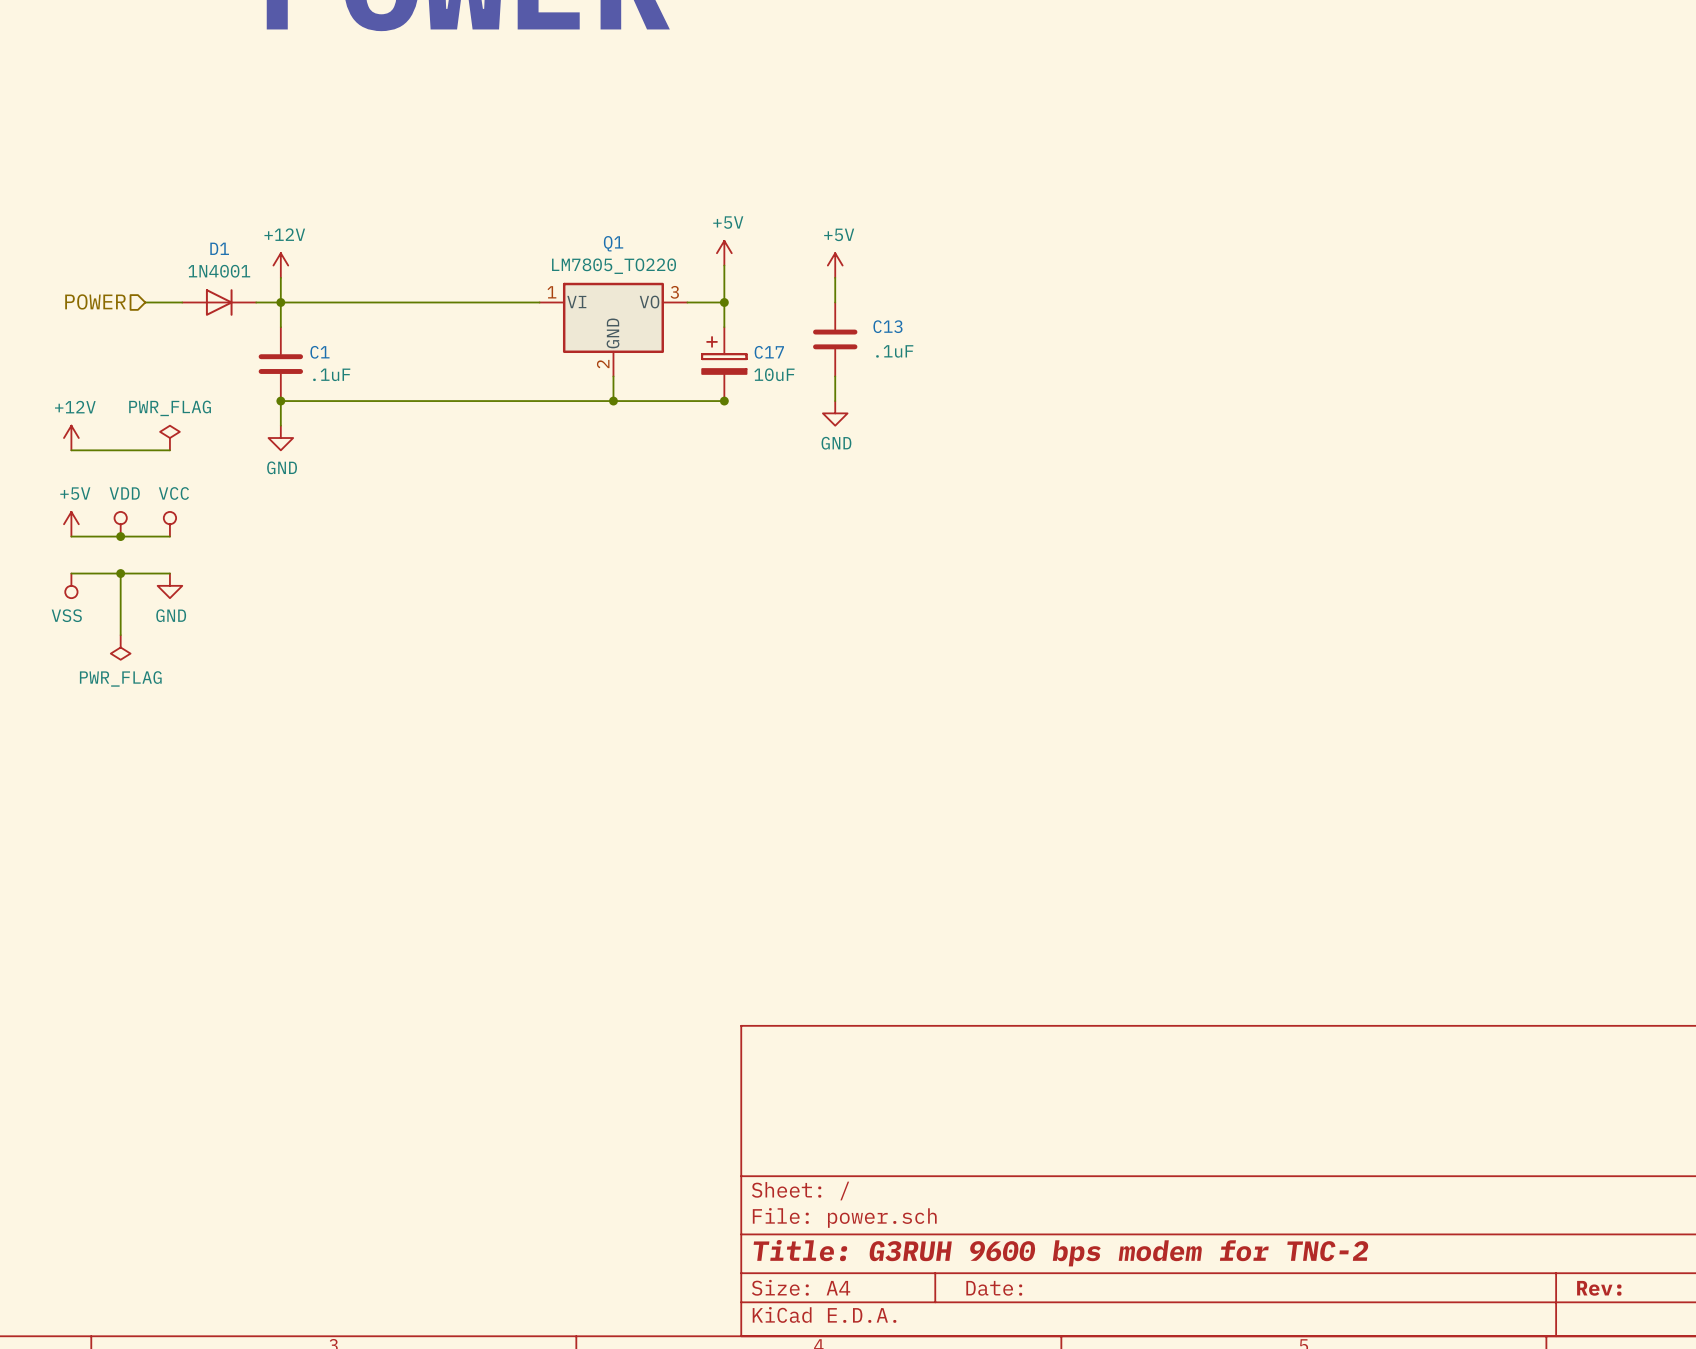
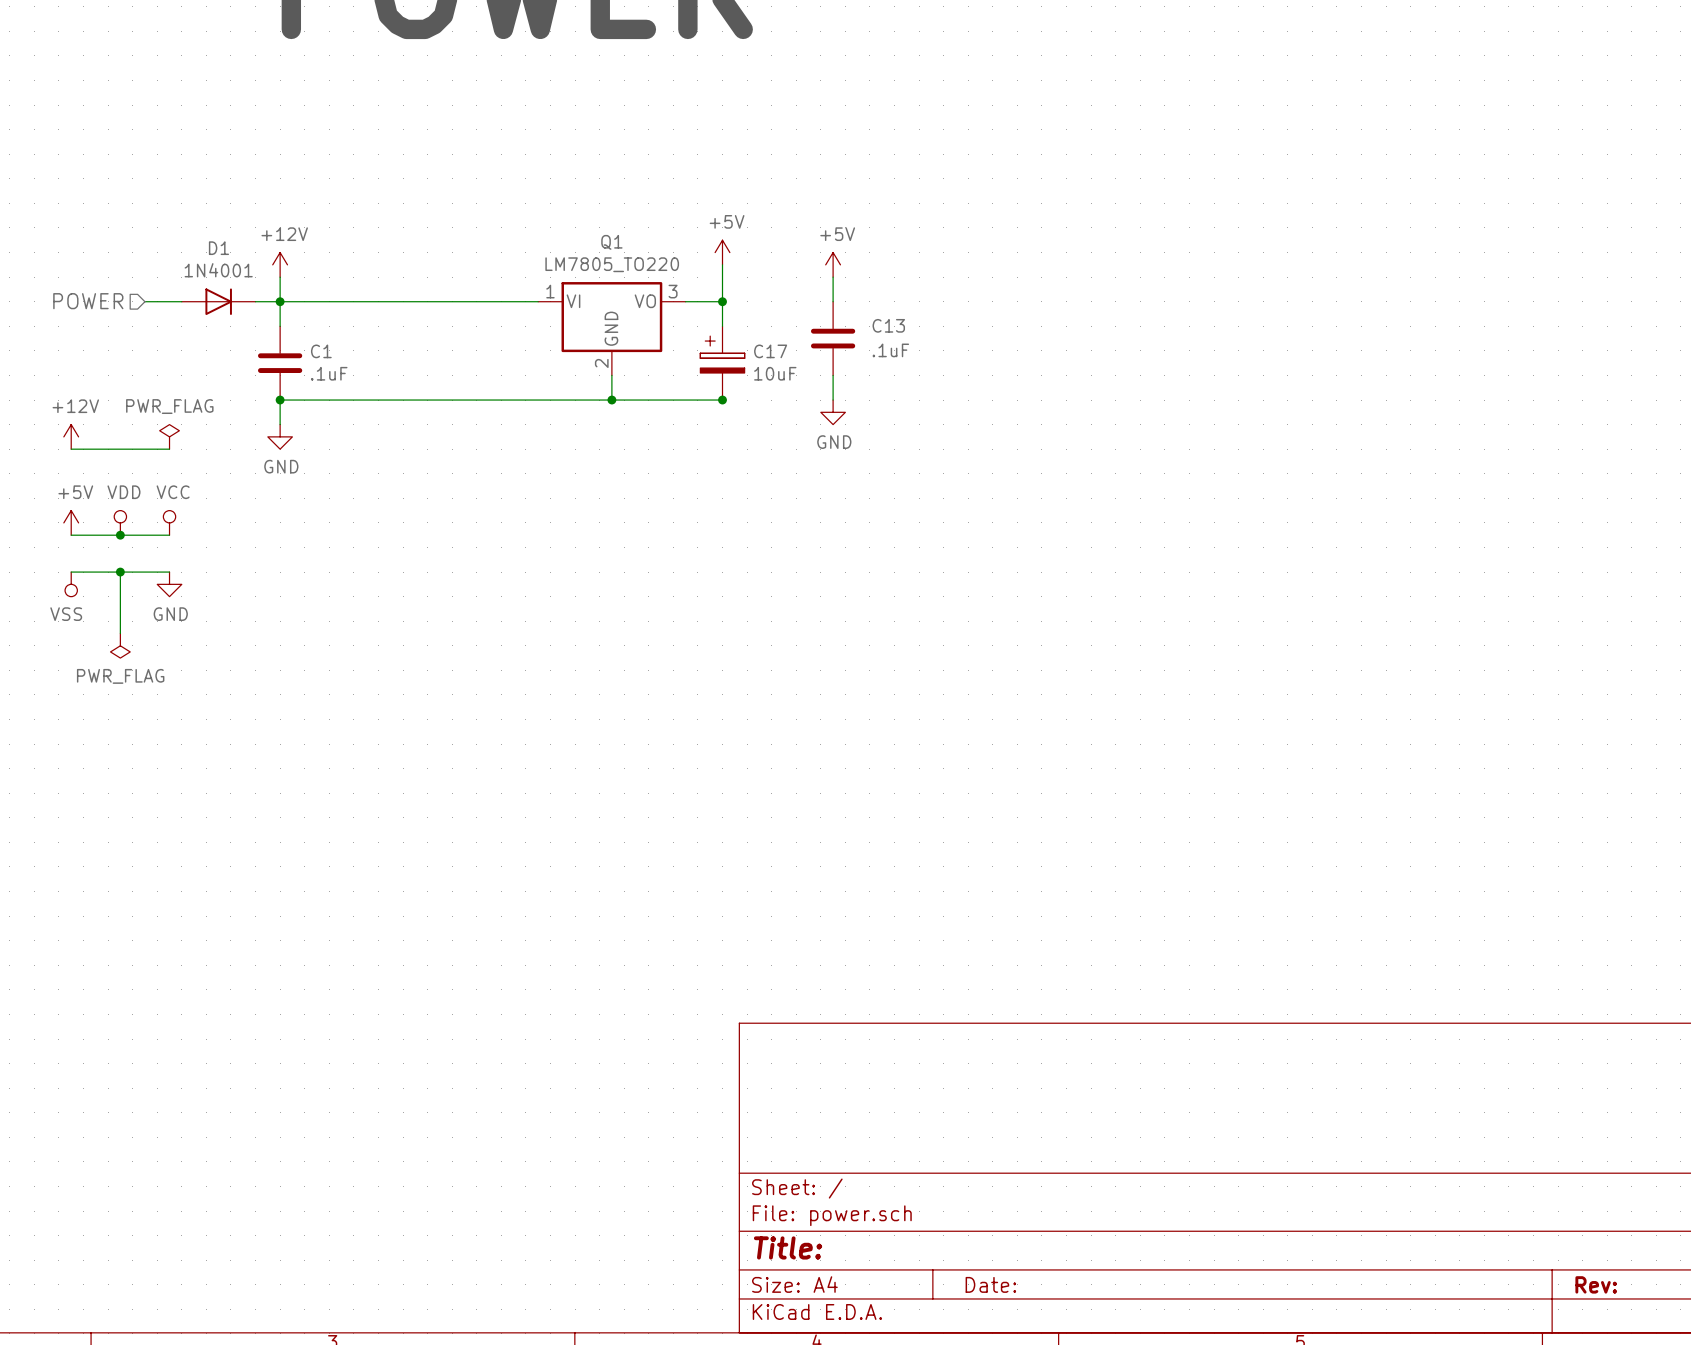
title block: Title: G3RUH 9600 bps modem for TNC-2 (1060, 1253) -> Title: (788, 1247)

